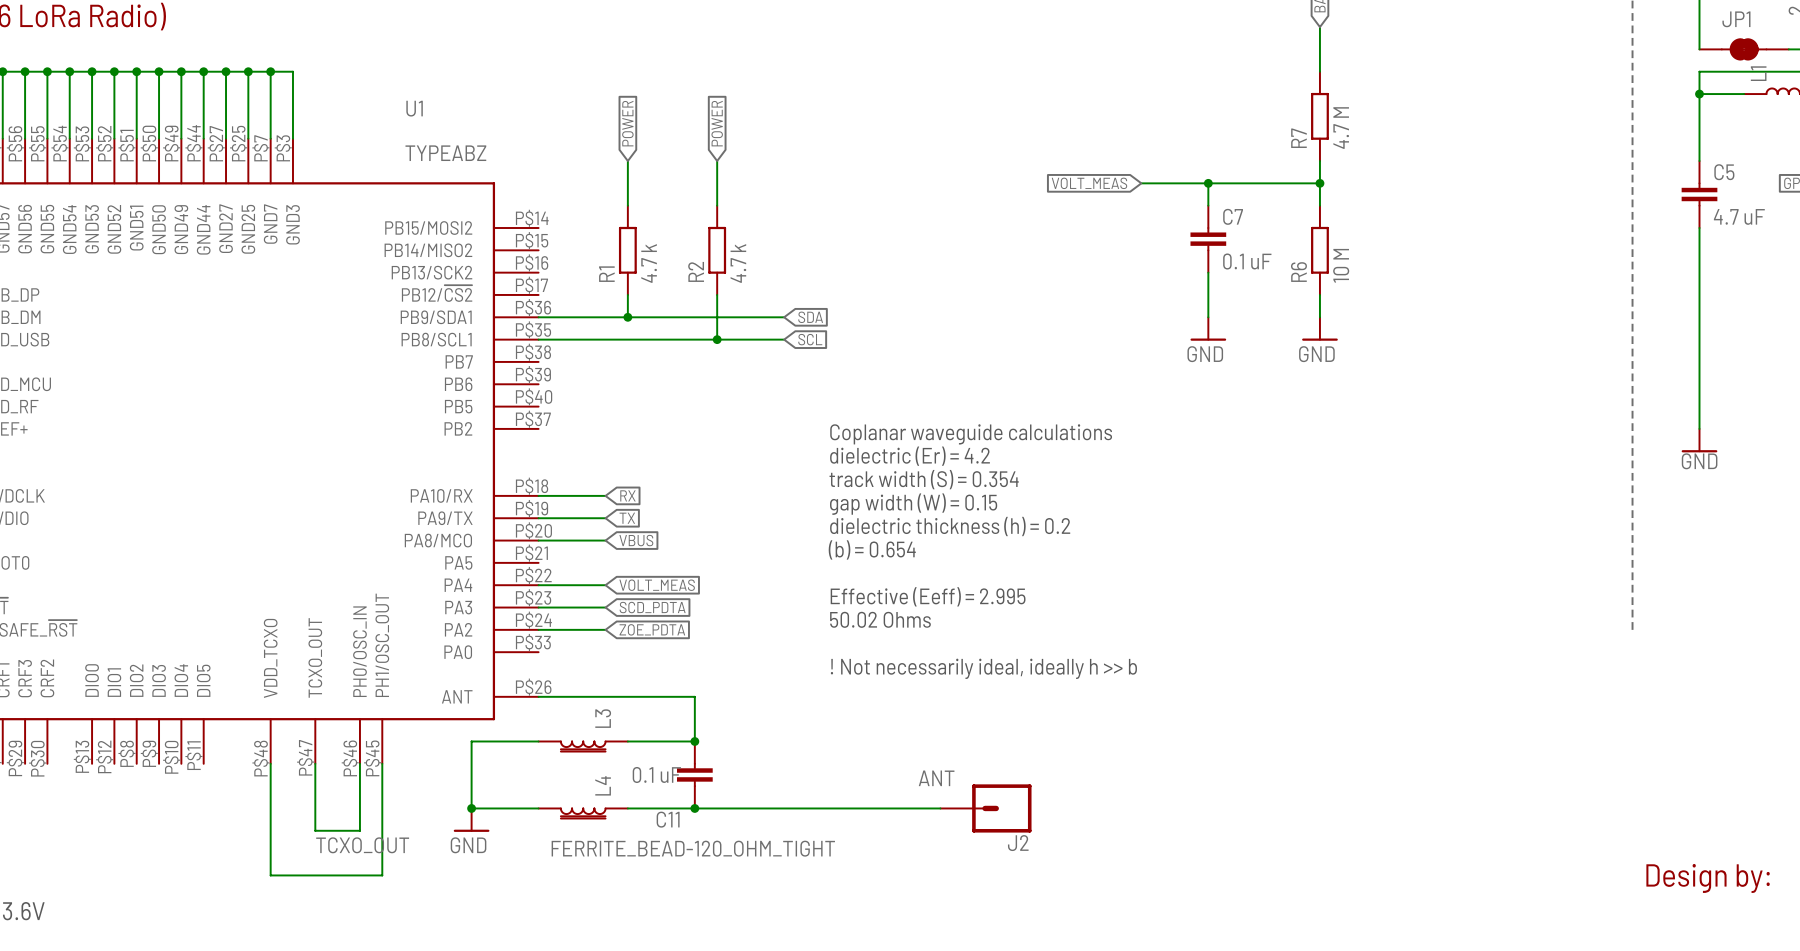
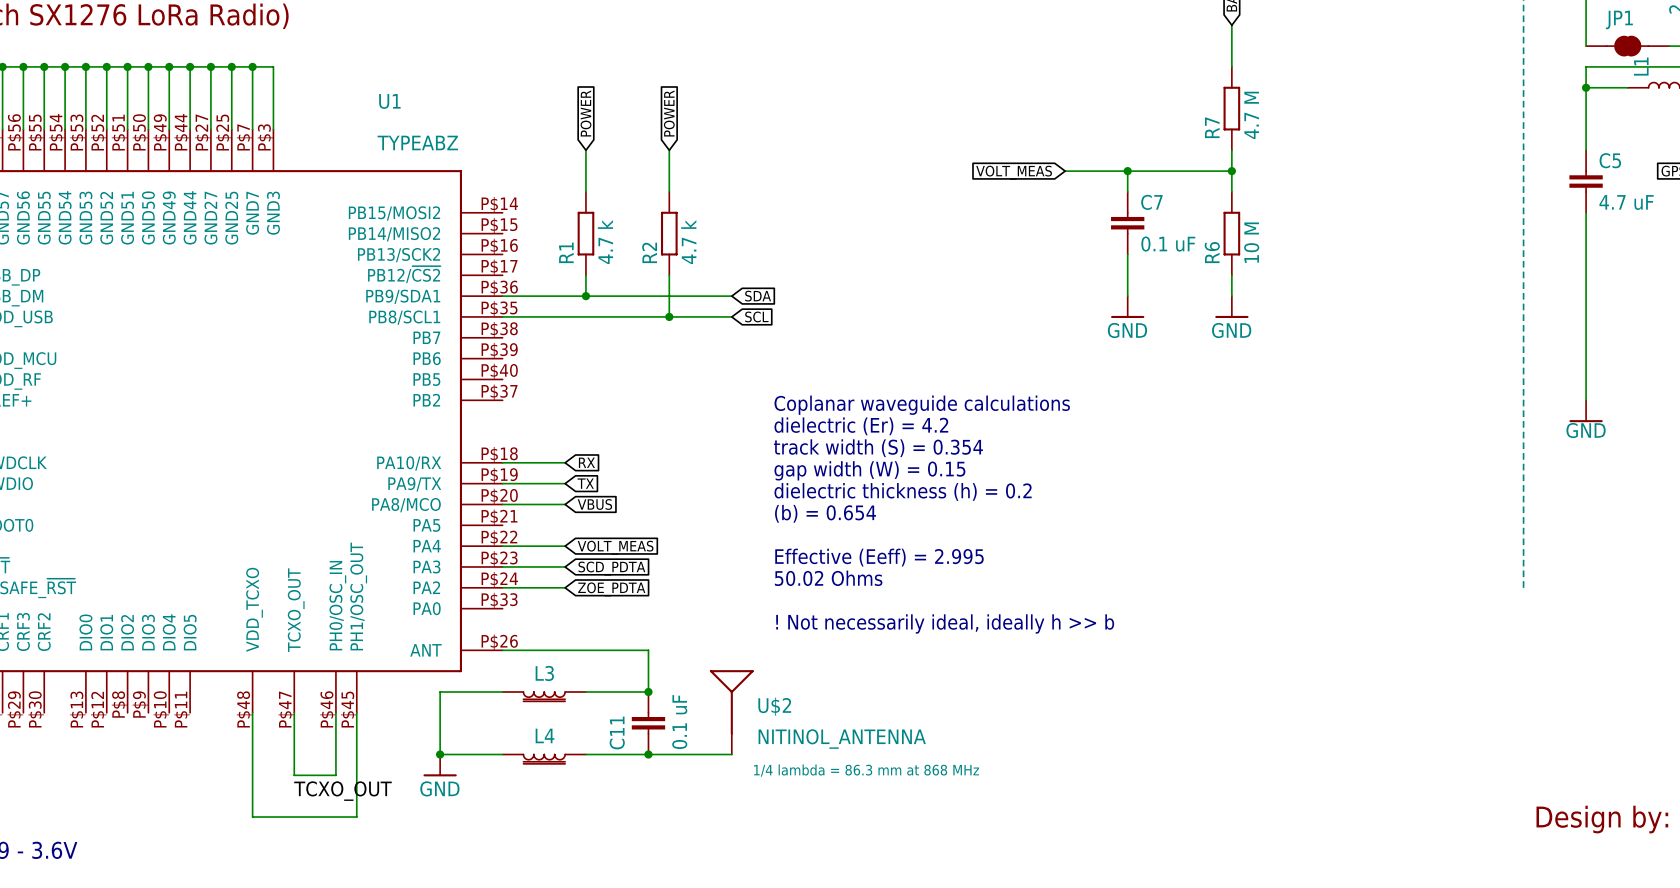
L3 name rotation: 0° (603, 718) -> 90° clockwise (544, 673)
U$2: none -> NITINOL_ANTENNA (731, 712)
C11 value rotation: 0° (656, 774) -> 90° counterclockwise (679, 722)
C11 value position: 0.1 uF (656, 774) -> 0.1 uF (679, 722)
label: ANT (936, 778) -> none
L4 name rotation: 0° (603, 785) -> 90° clockwise (545, 735)
wire: (784, 808) (940, 808) -> none
J2: (985, 808) -> none
C11 name rotation: 0° (668, 819) -> 90° counterclockwise (617, 732)
text: none -> 1/4 lambda = 86.3 mm at 868 MHz (866, 770)
L3 value: FERRITE_BEAD-120_OHM_TIGHT (693, 848) -> none

